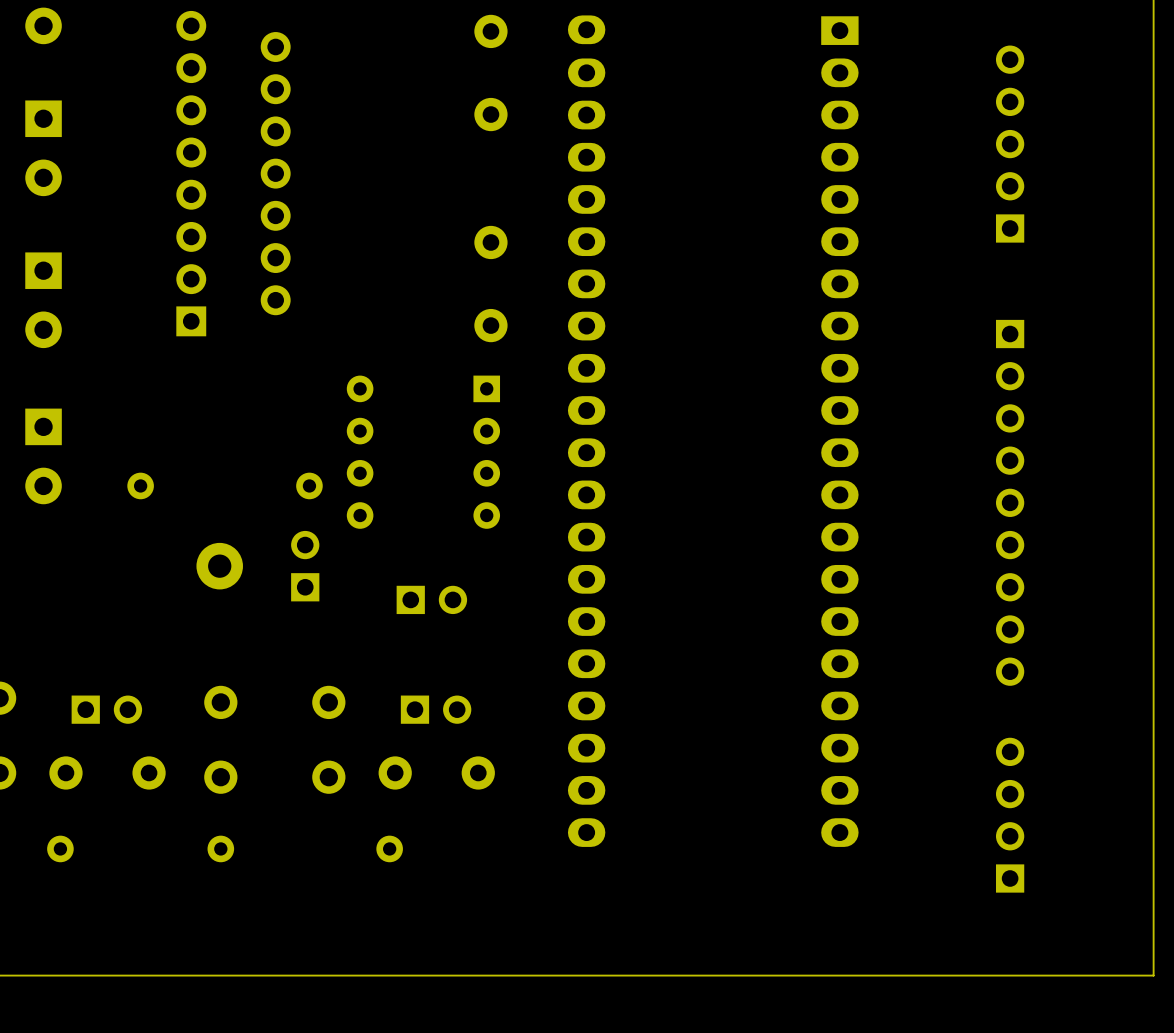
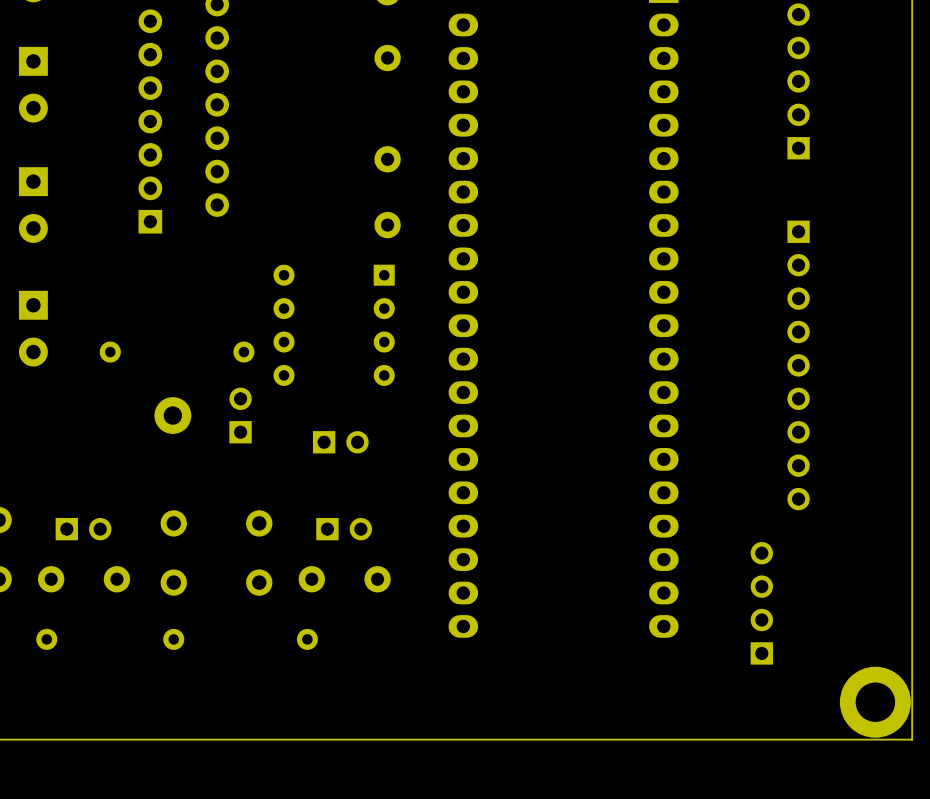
part position: (1010, 815) -> (761, 603)
part: none -> (875, 702)

